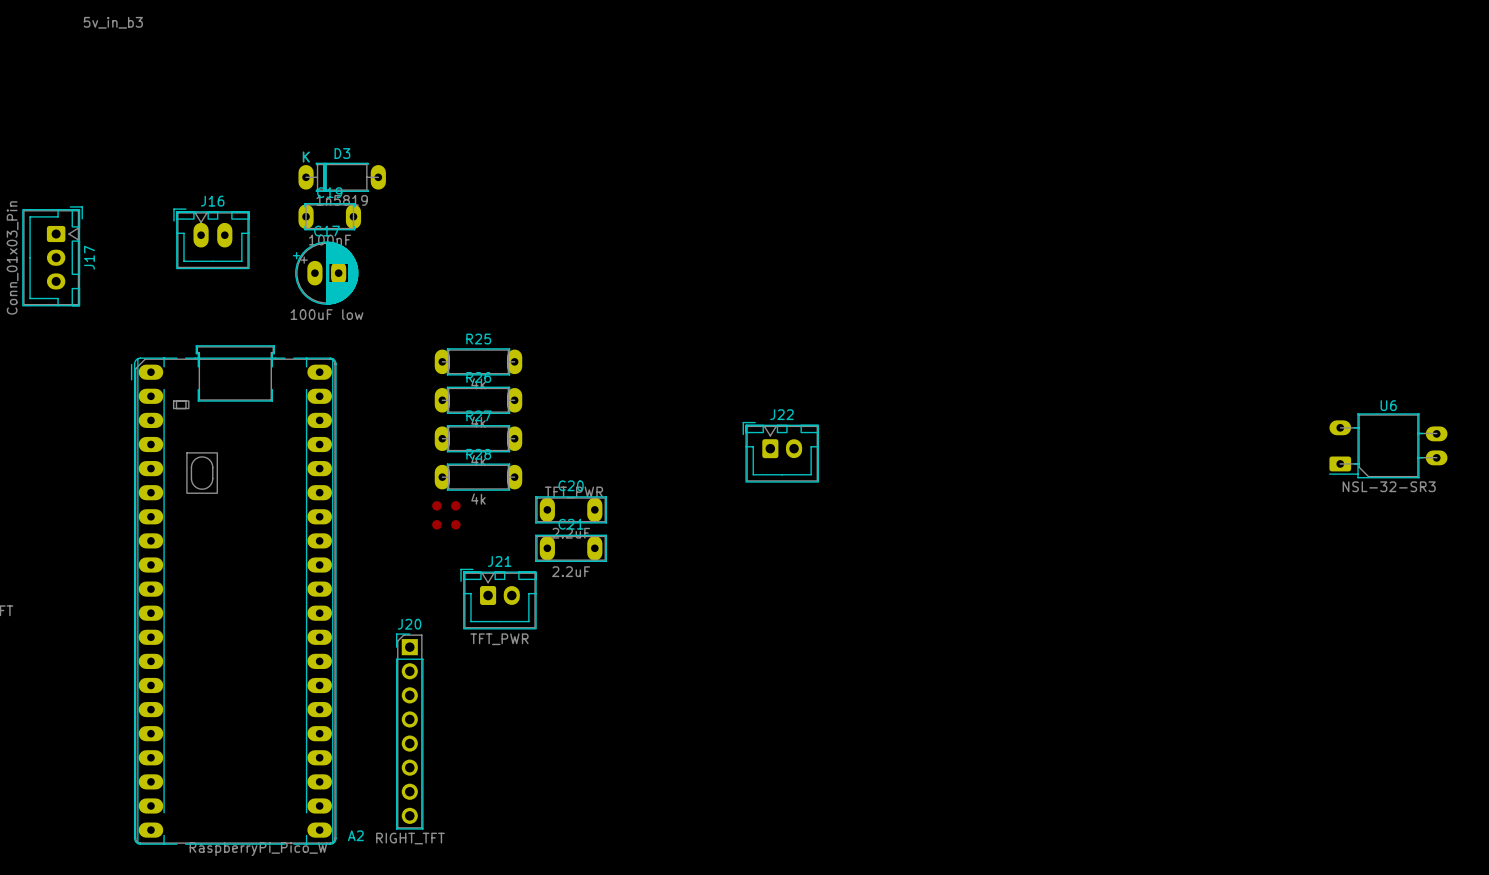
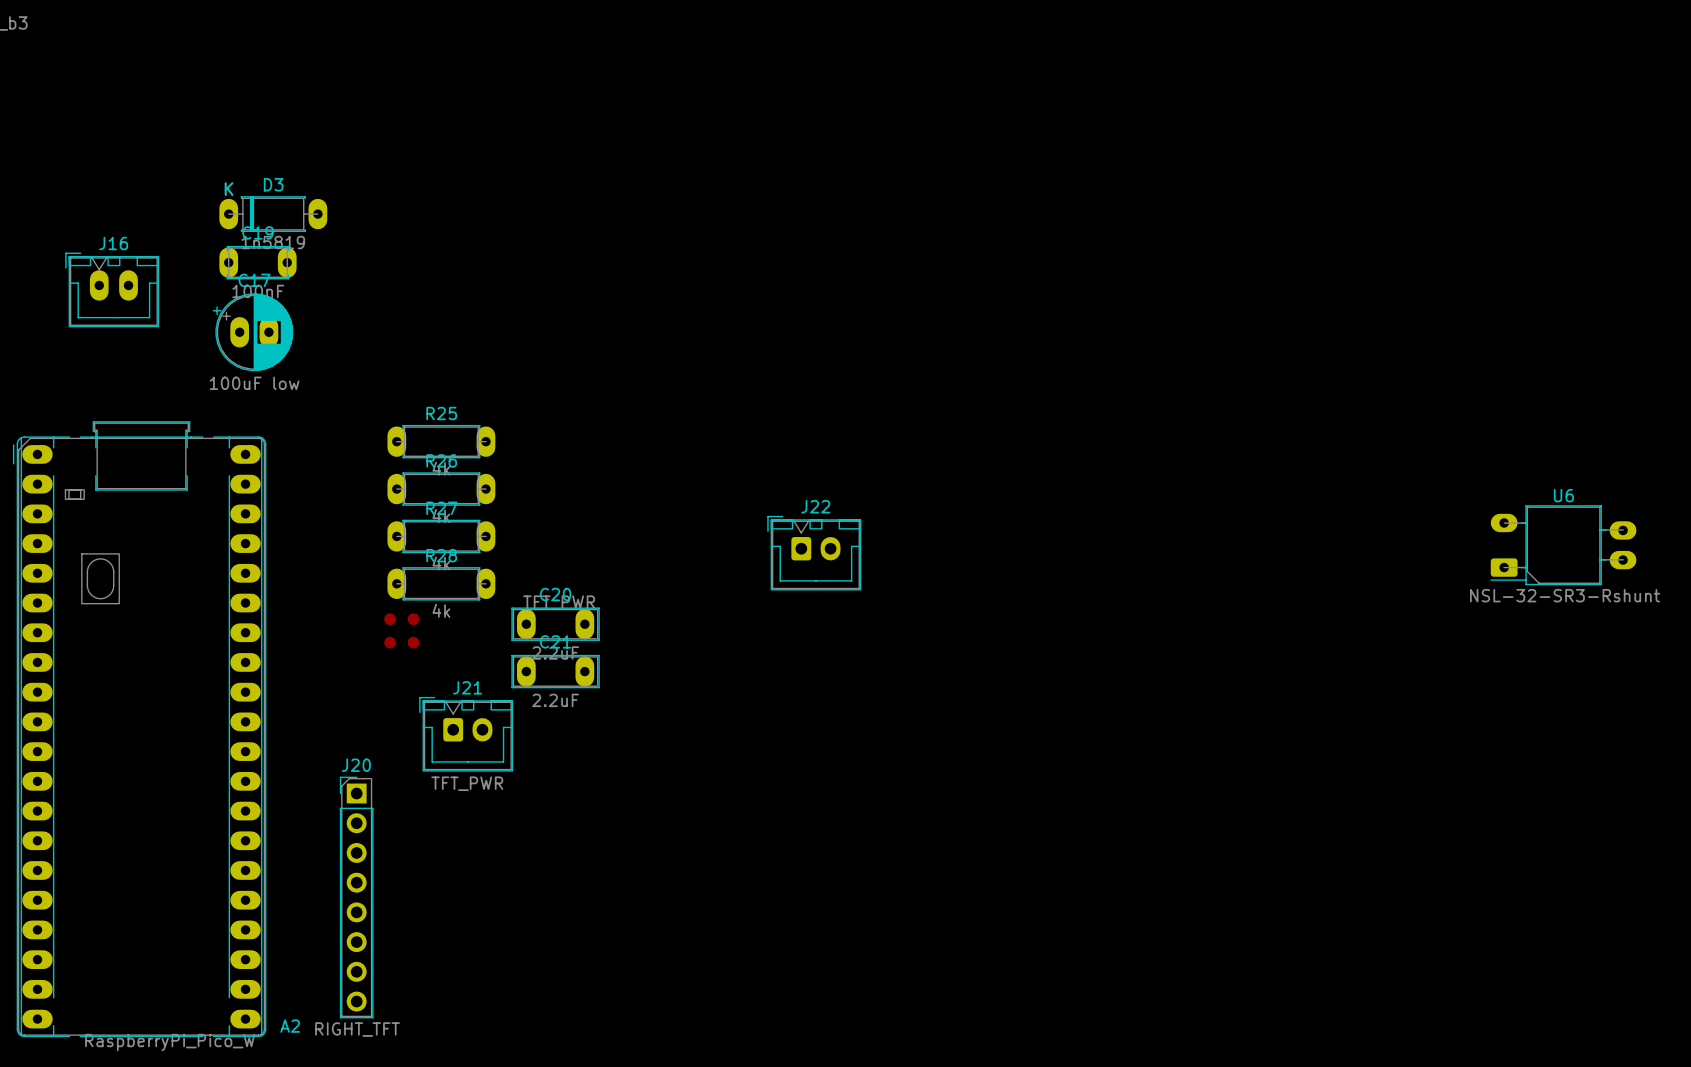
U6 value: NSL-32-SR3 (1389, 486) -> NSL-32-SR3-Rshunt (1565, 595)

